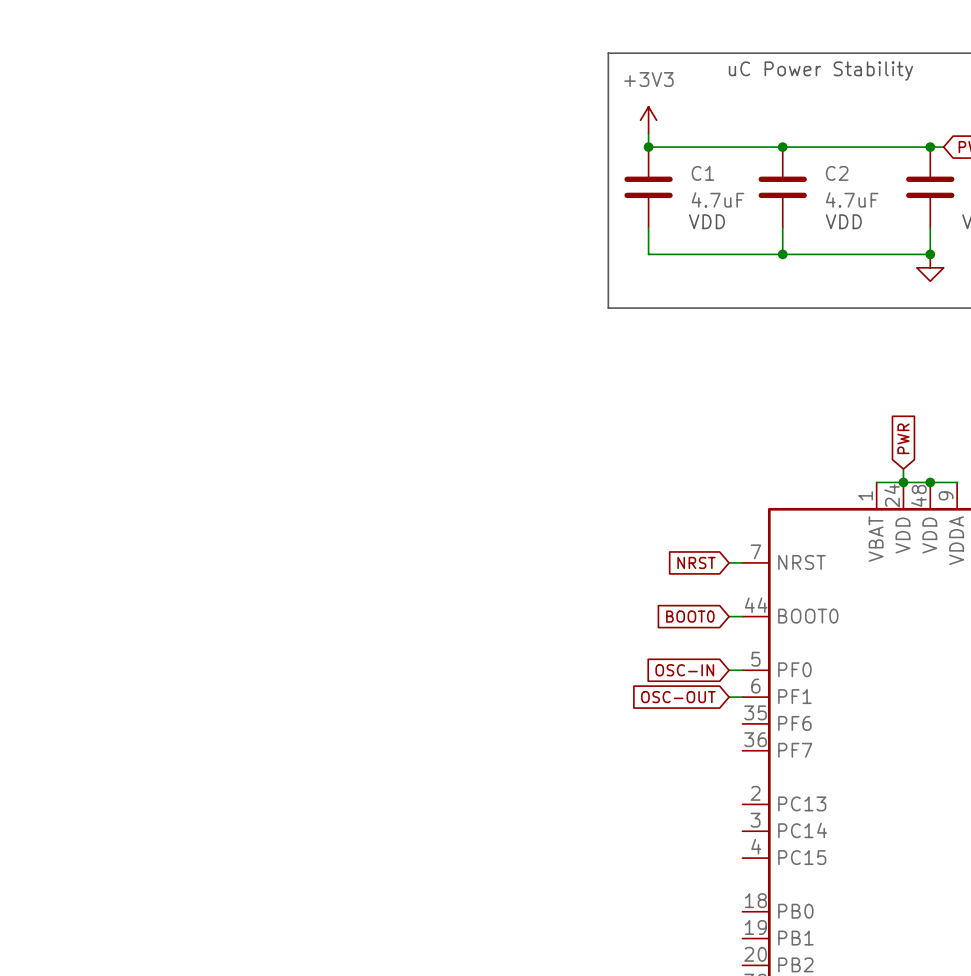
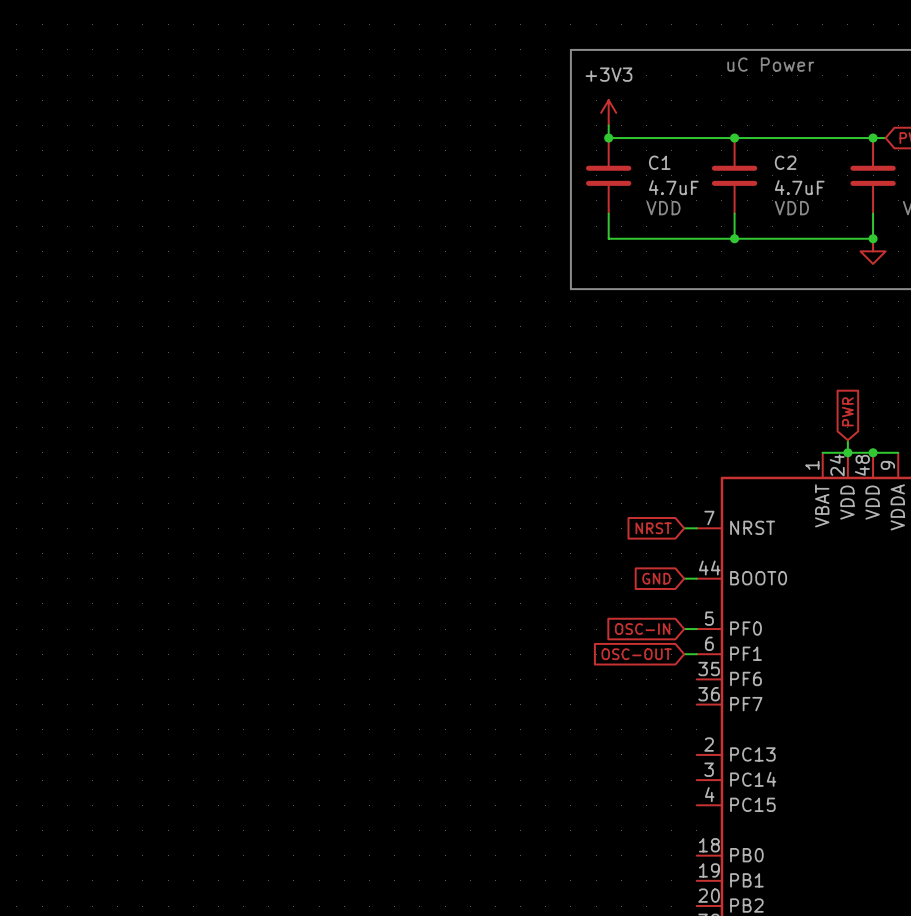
text: uC Power Stability (820, 71) -> uC Power (770, 64)
global label: BOOT0 (690, 616) -> GND (656, 578)

